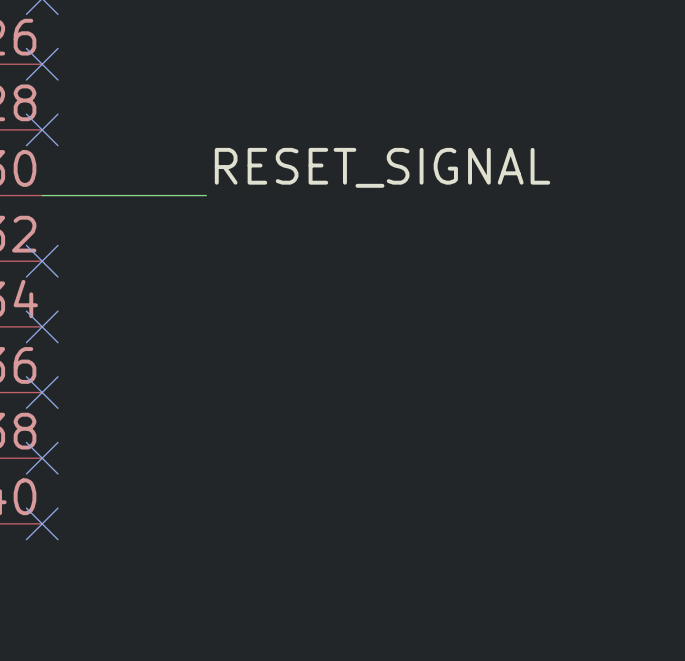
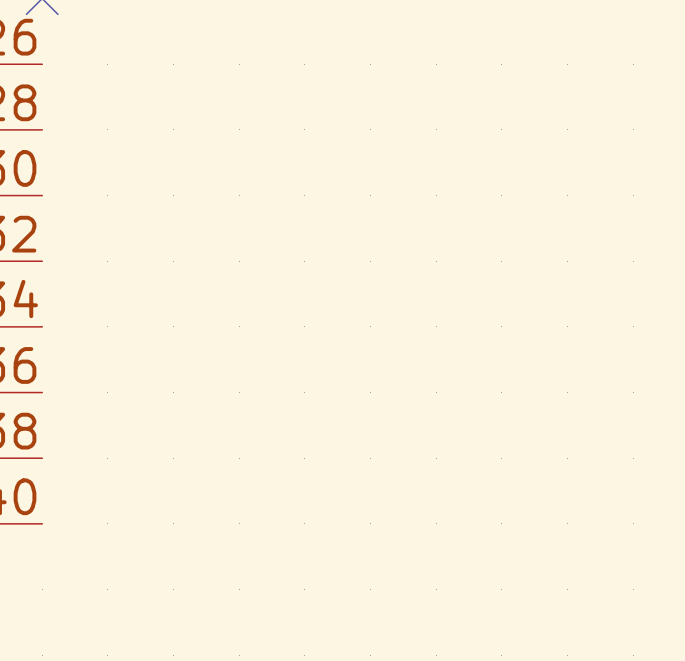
no-connect mark: (42, 64) -> none
no-connect mark: (42, 129) -> none
label: RESET_SIGNAL (382, 167) -> none
wire: (42, 195) (206, 195) -> none
no-connect mark: (42, 261) -> none
no-connect mark: (42, 326) -> none
no-connect mark: (42, 392) -> none
no-connect mark: (42, 458) -> none
no-connect mark: (42, 523) -> none

